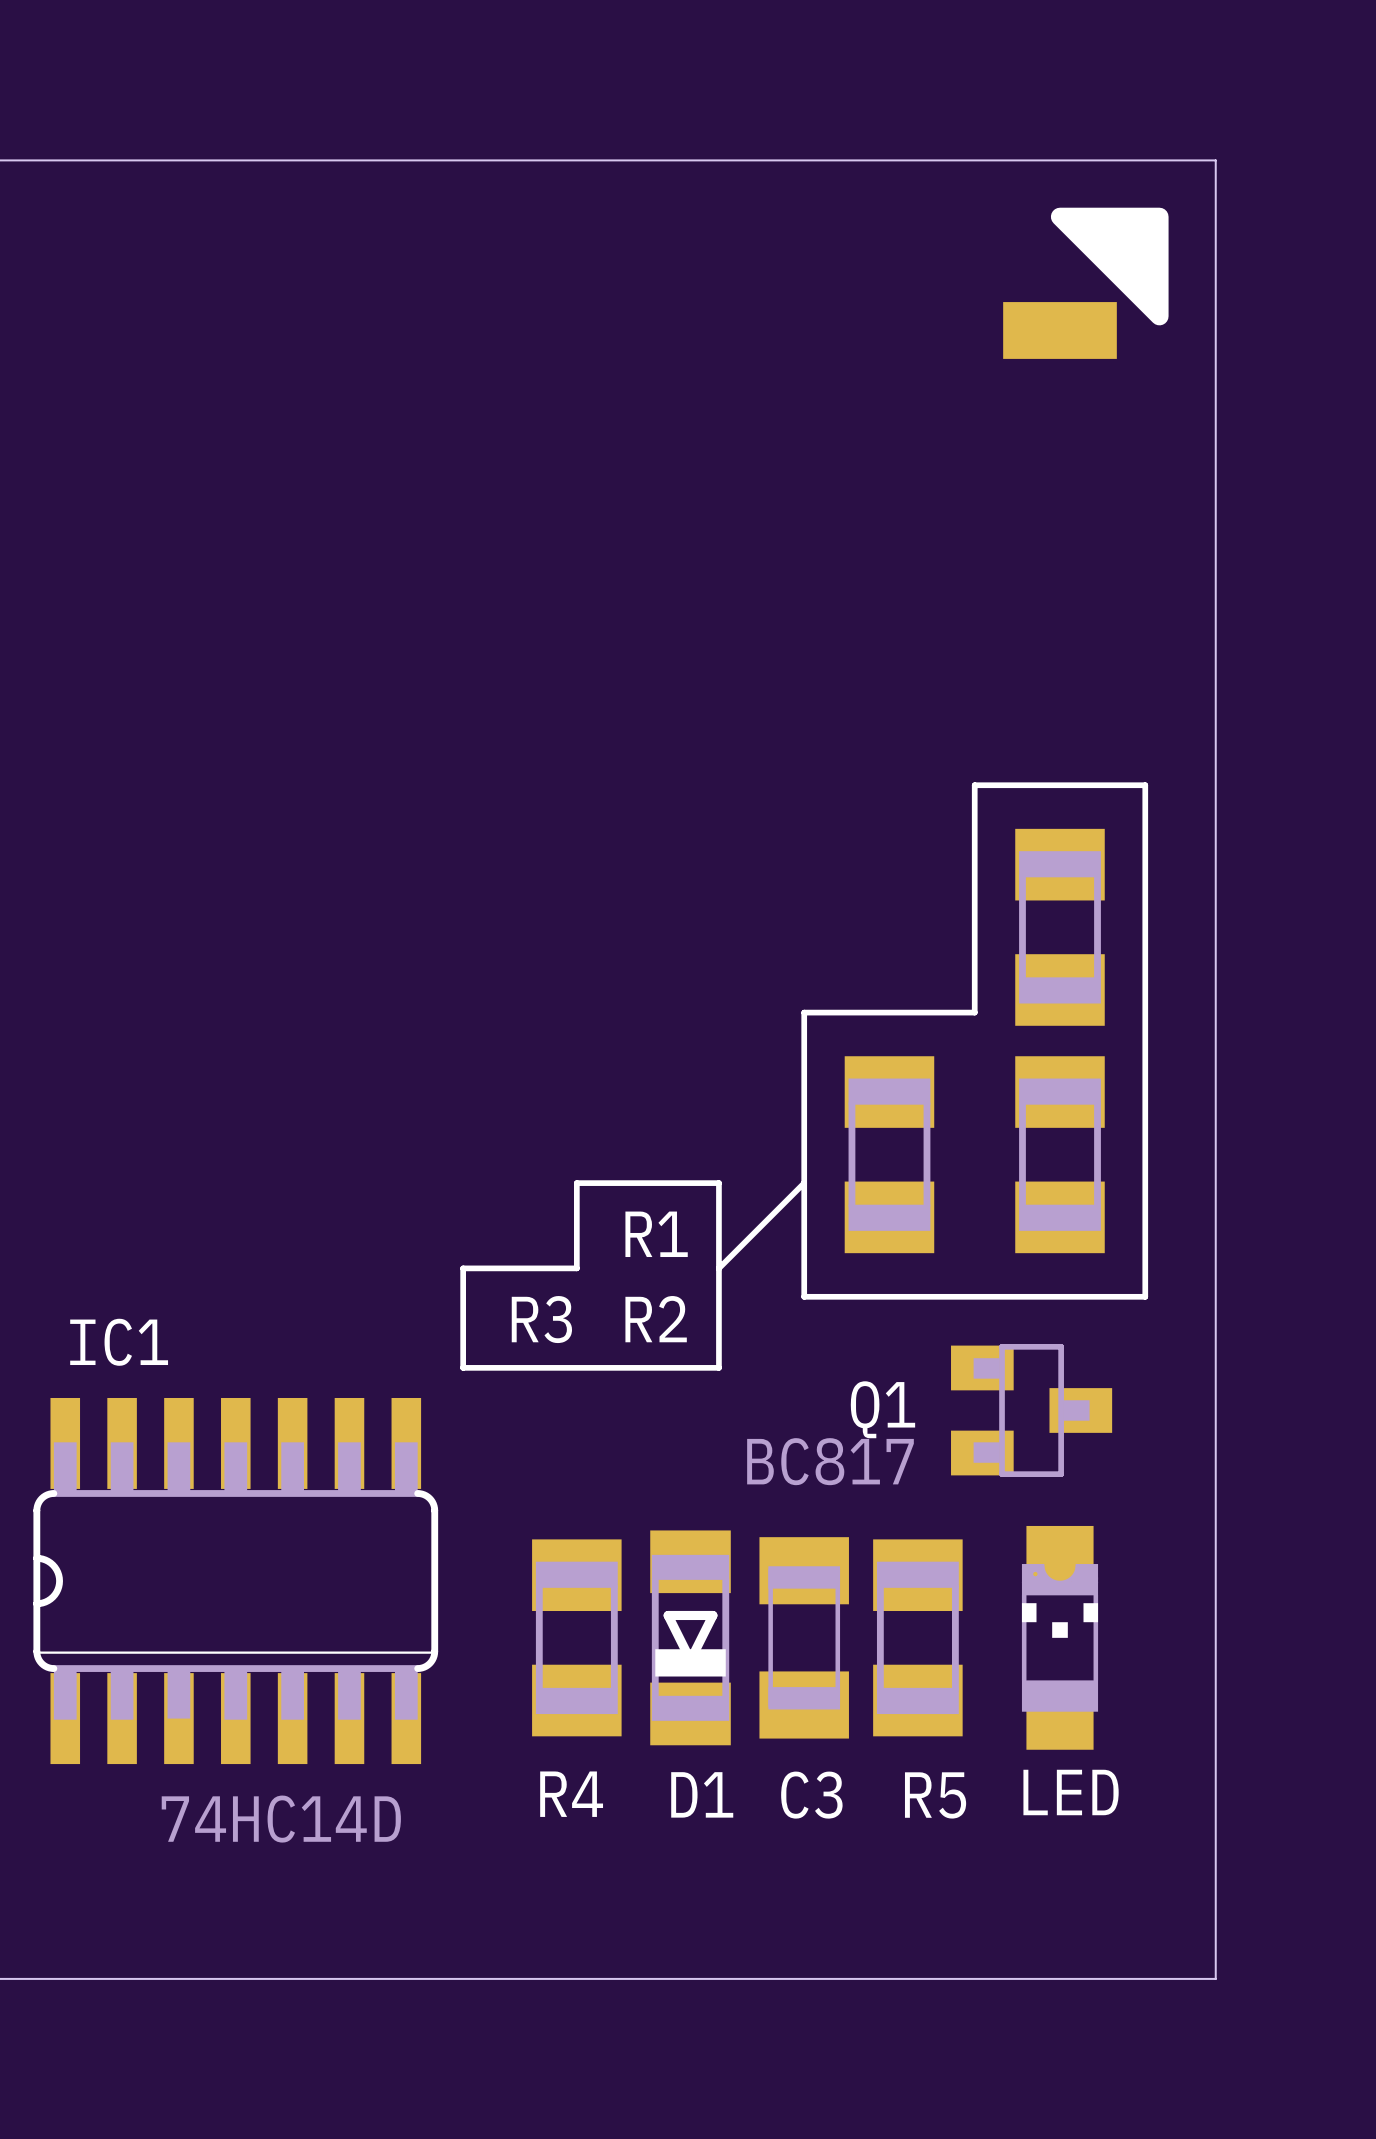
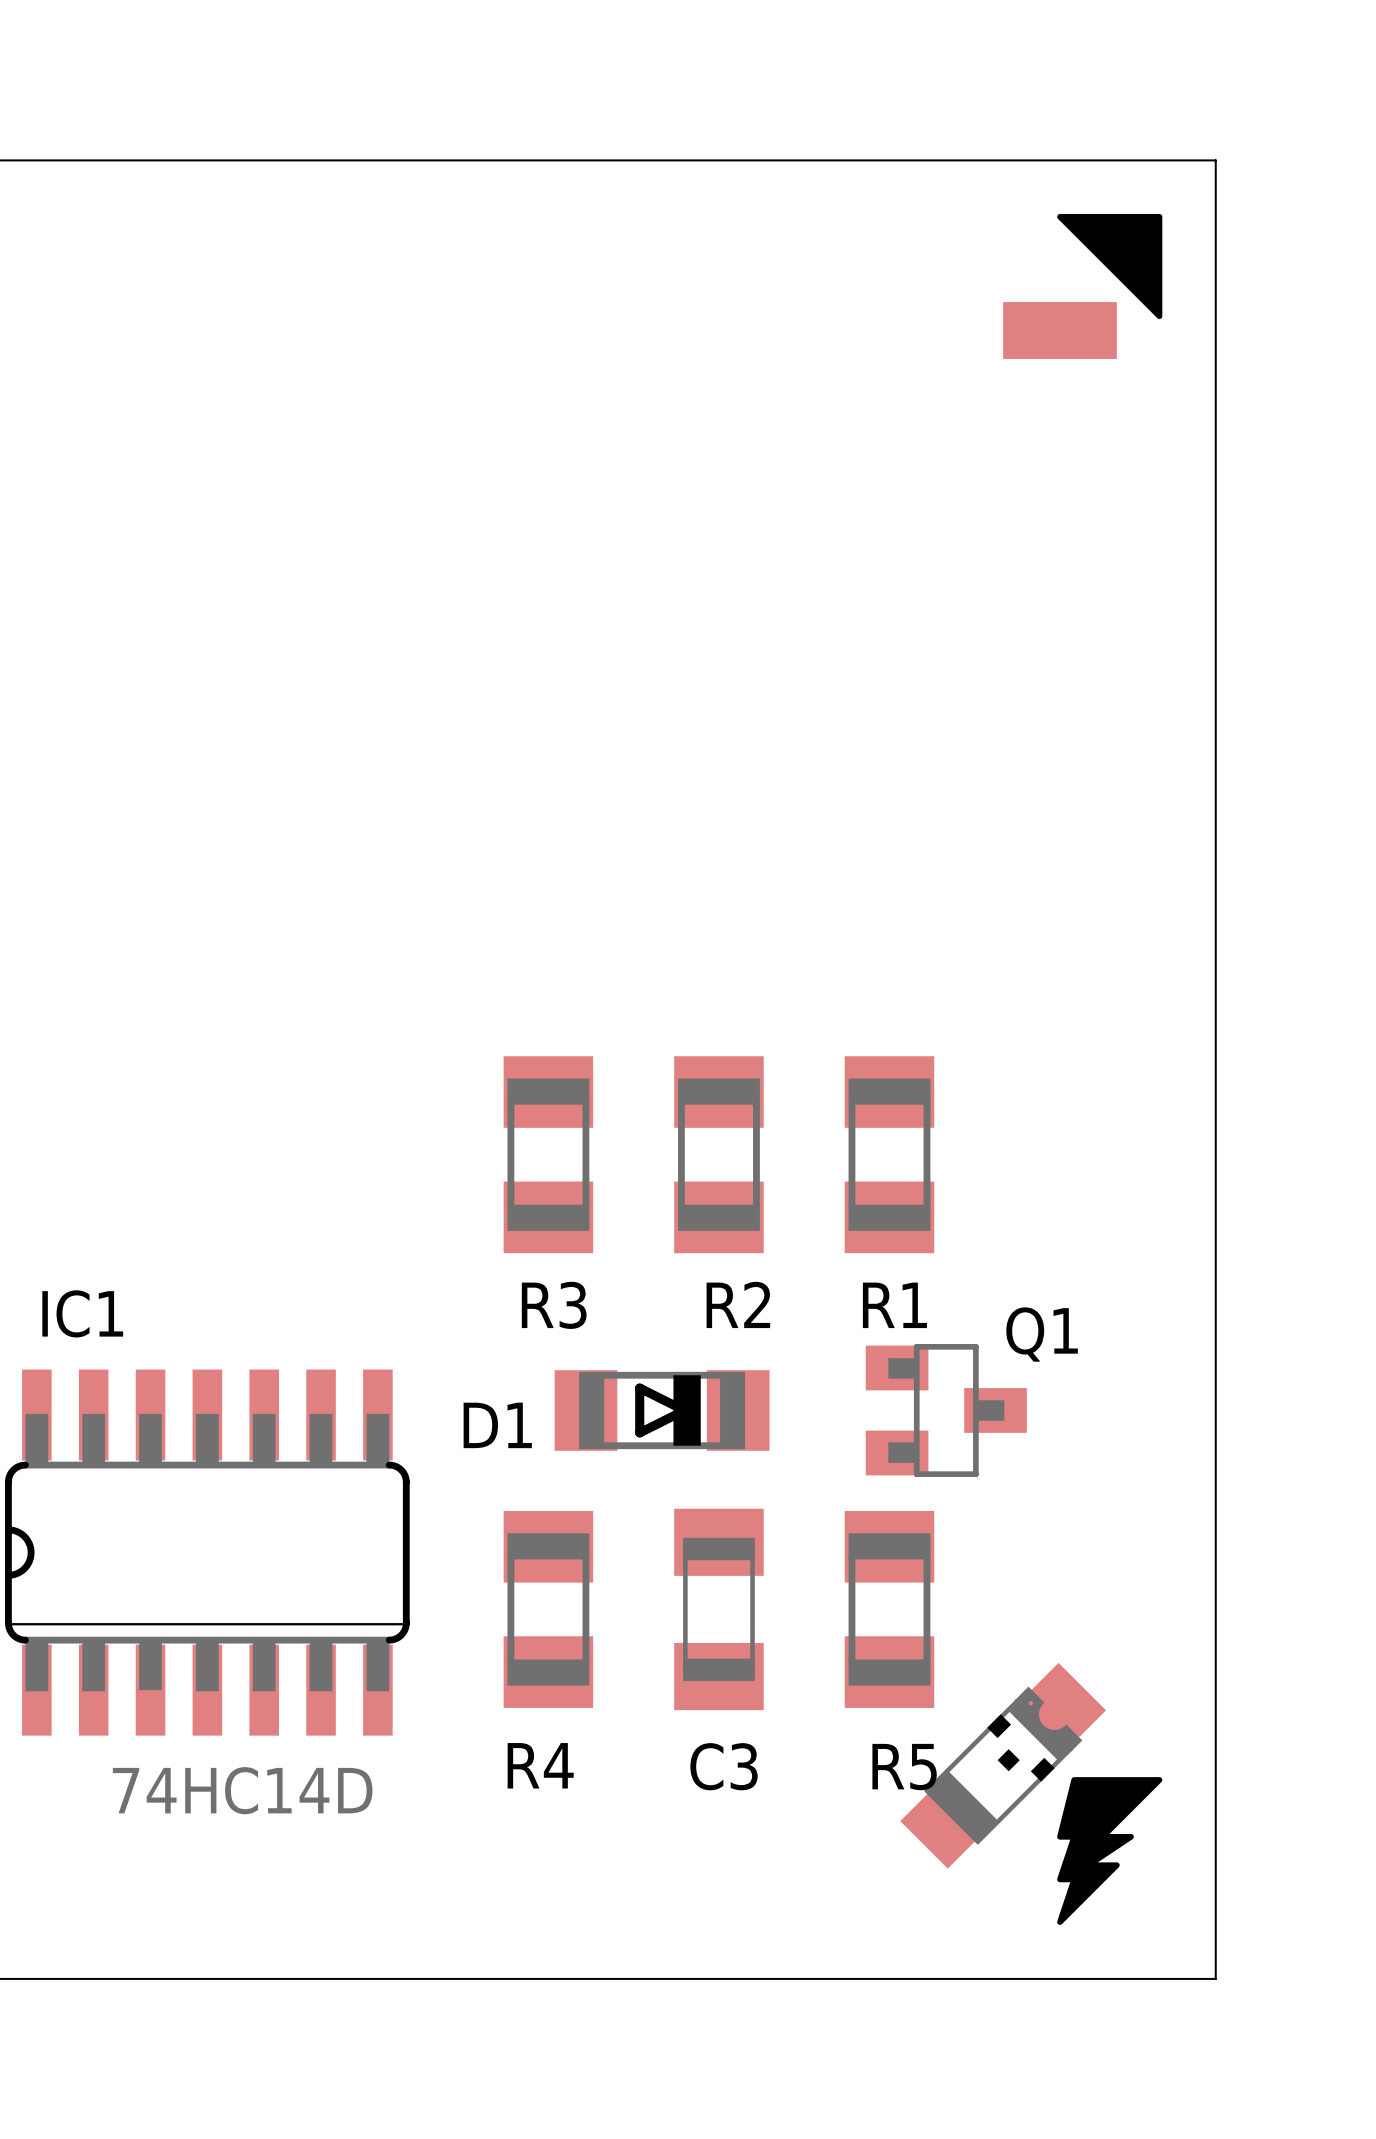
drawing shape: [1050, 207, 1169, 326] -> [1057, 213, 1163, 320]
line: (974, 785) (1145, 785) (1145, 1296) (804, 1296) (804, 1012) (974, 1012) (974, 785) -> none
R1: (1060, 927) -> none
R3: none -> (548, 1154)
R2 position: (1060, 1154) -> (718, 1154)
line: (576, 1183) (576, 1268) (463, 1268) (463, 1367) (718, 1367) (718, 1183) (576, 1183) -> none
line: (804, 1183) (718, 1268) -> none
R3 name: R3 (541, 1319) -> R1 (894, 1305)
R2 name position: R2 (656, 1319) -> R2 (738, 1304)
Q1 name position: Q1 (882, 1409) -> Q1 (1042, 1334)
Q1 position: (1031, 1410) -> (946, 1410)
Q1 value: BC817 (830, 1461) -> none
IC1 position: (235, 1581) -> (207, 1552)
R4 position: (576, 1637) -> (548, 1609)
D1 rotation: 0° (690, 1637) -> 90° counterclockwise (662, 1410)
D1 position: (690, 1637) -> (662, 1410)
C3 position: (804, 1637) -> (718, 1609)
R5 position: (917, 1637) -> (889, 1609)
LED: (1060, 1637) -> none
part: none -> (1003, 1765)
drawing: none -> [1057, 1777, 1163, 1925]
D1 name position: D1 (702, 1794) -> D1 (497, 1425)

